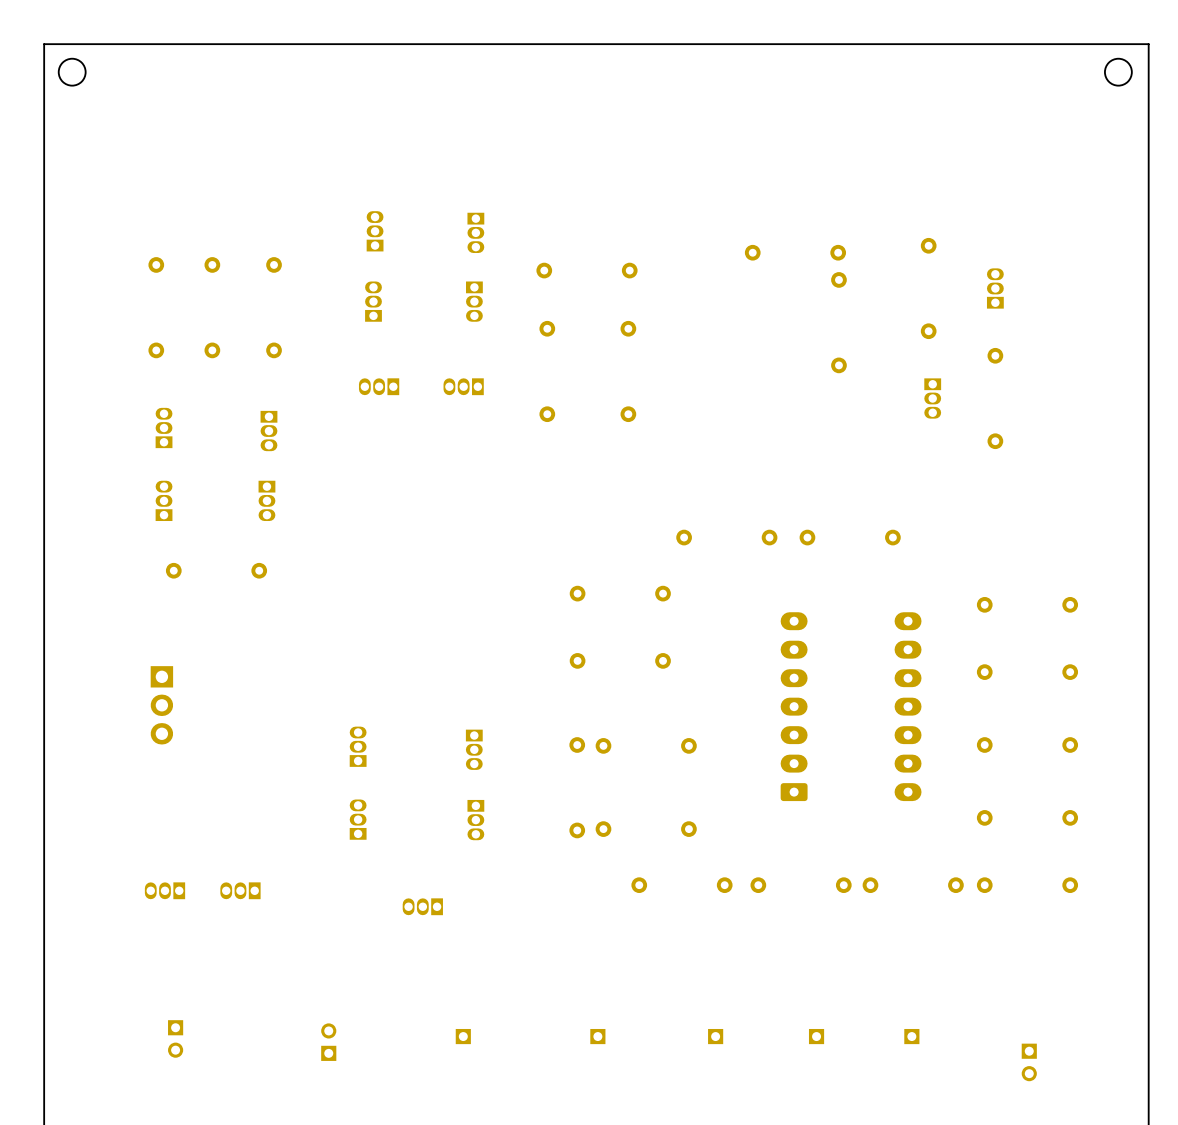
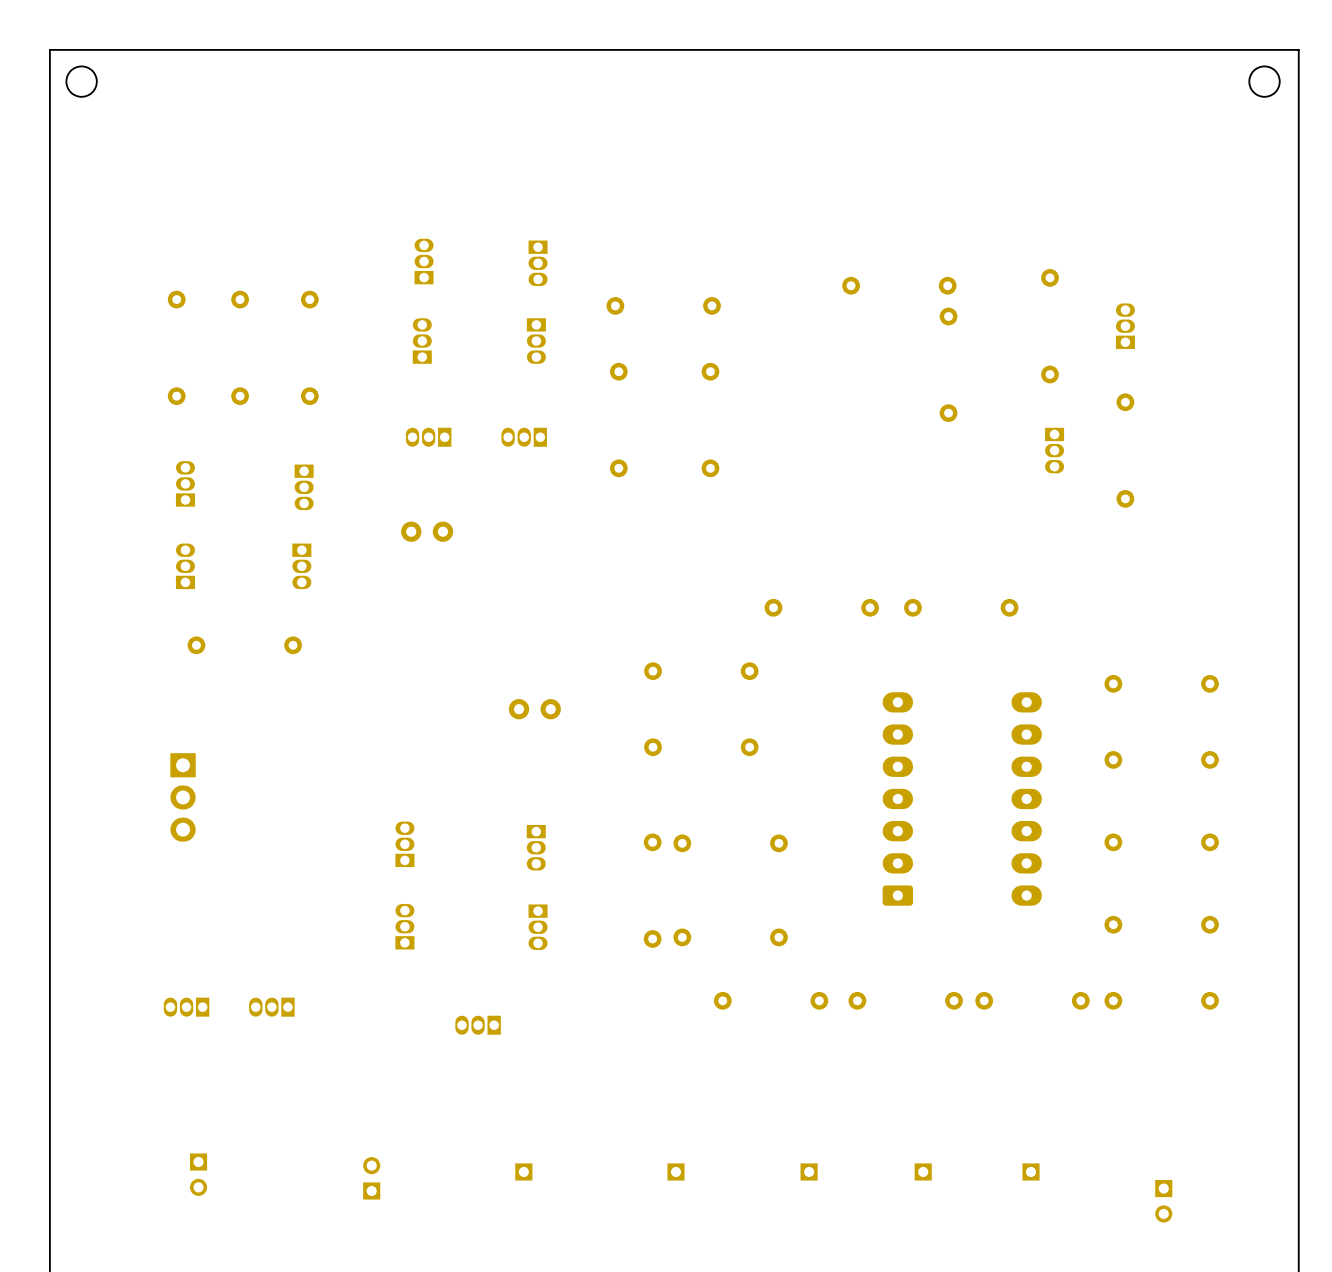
part: none -> (427, 531)
part: none -> (534, 709)

